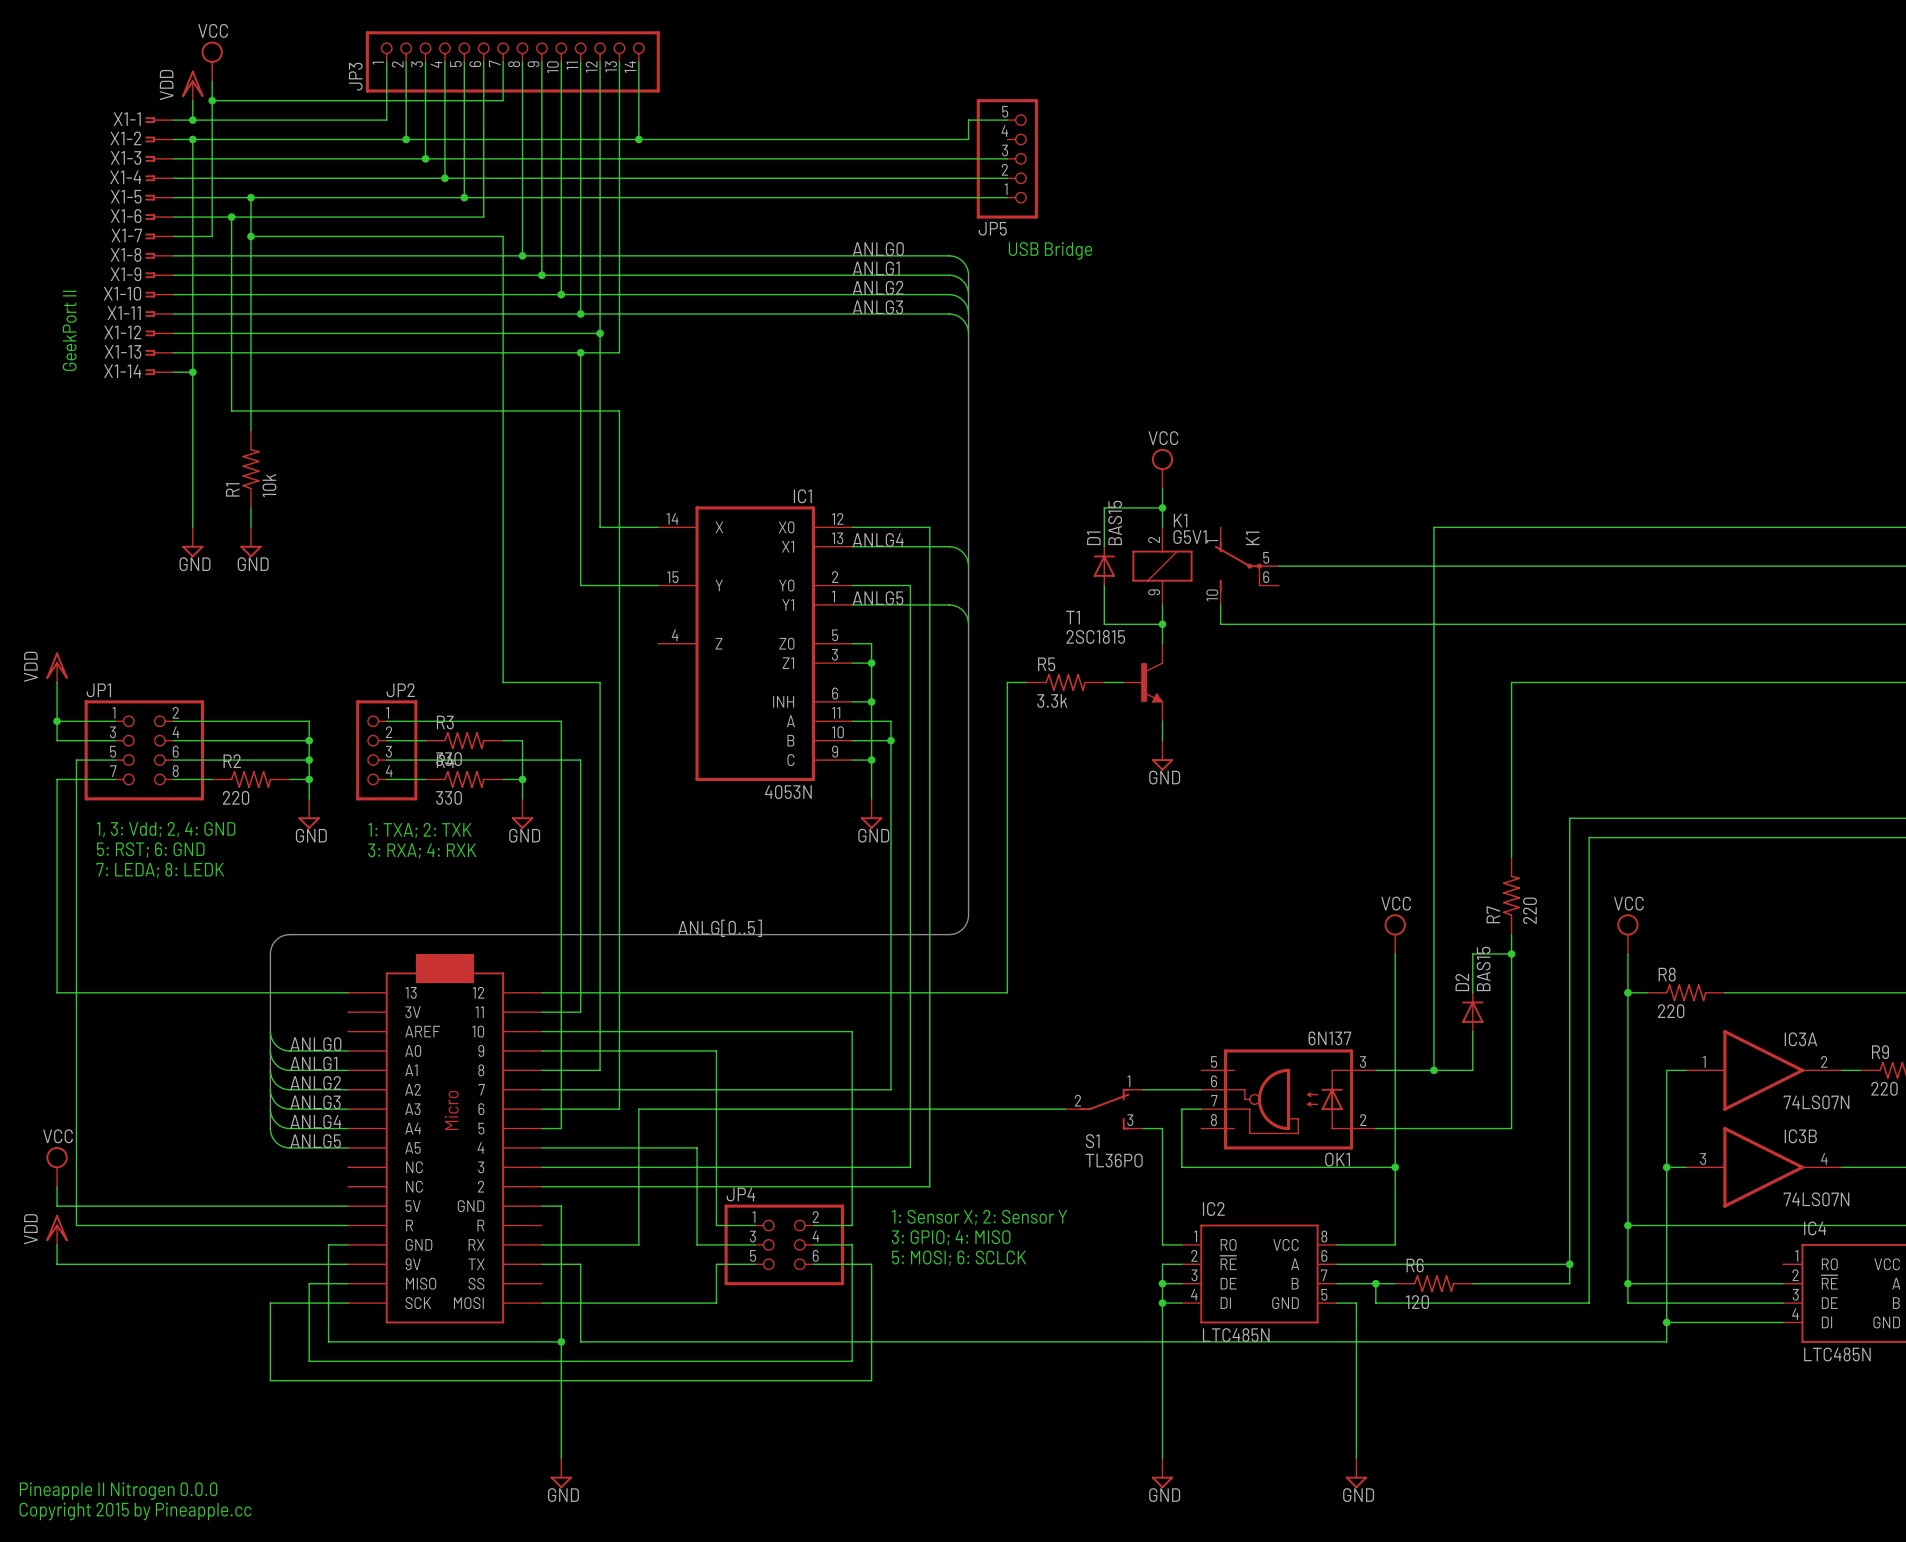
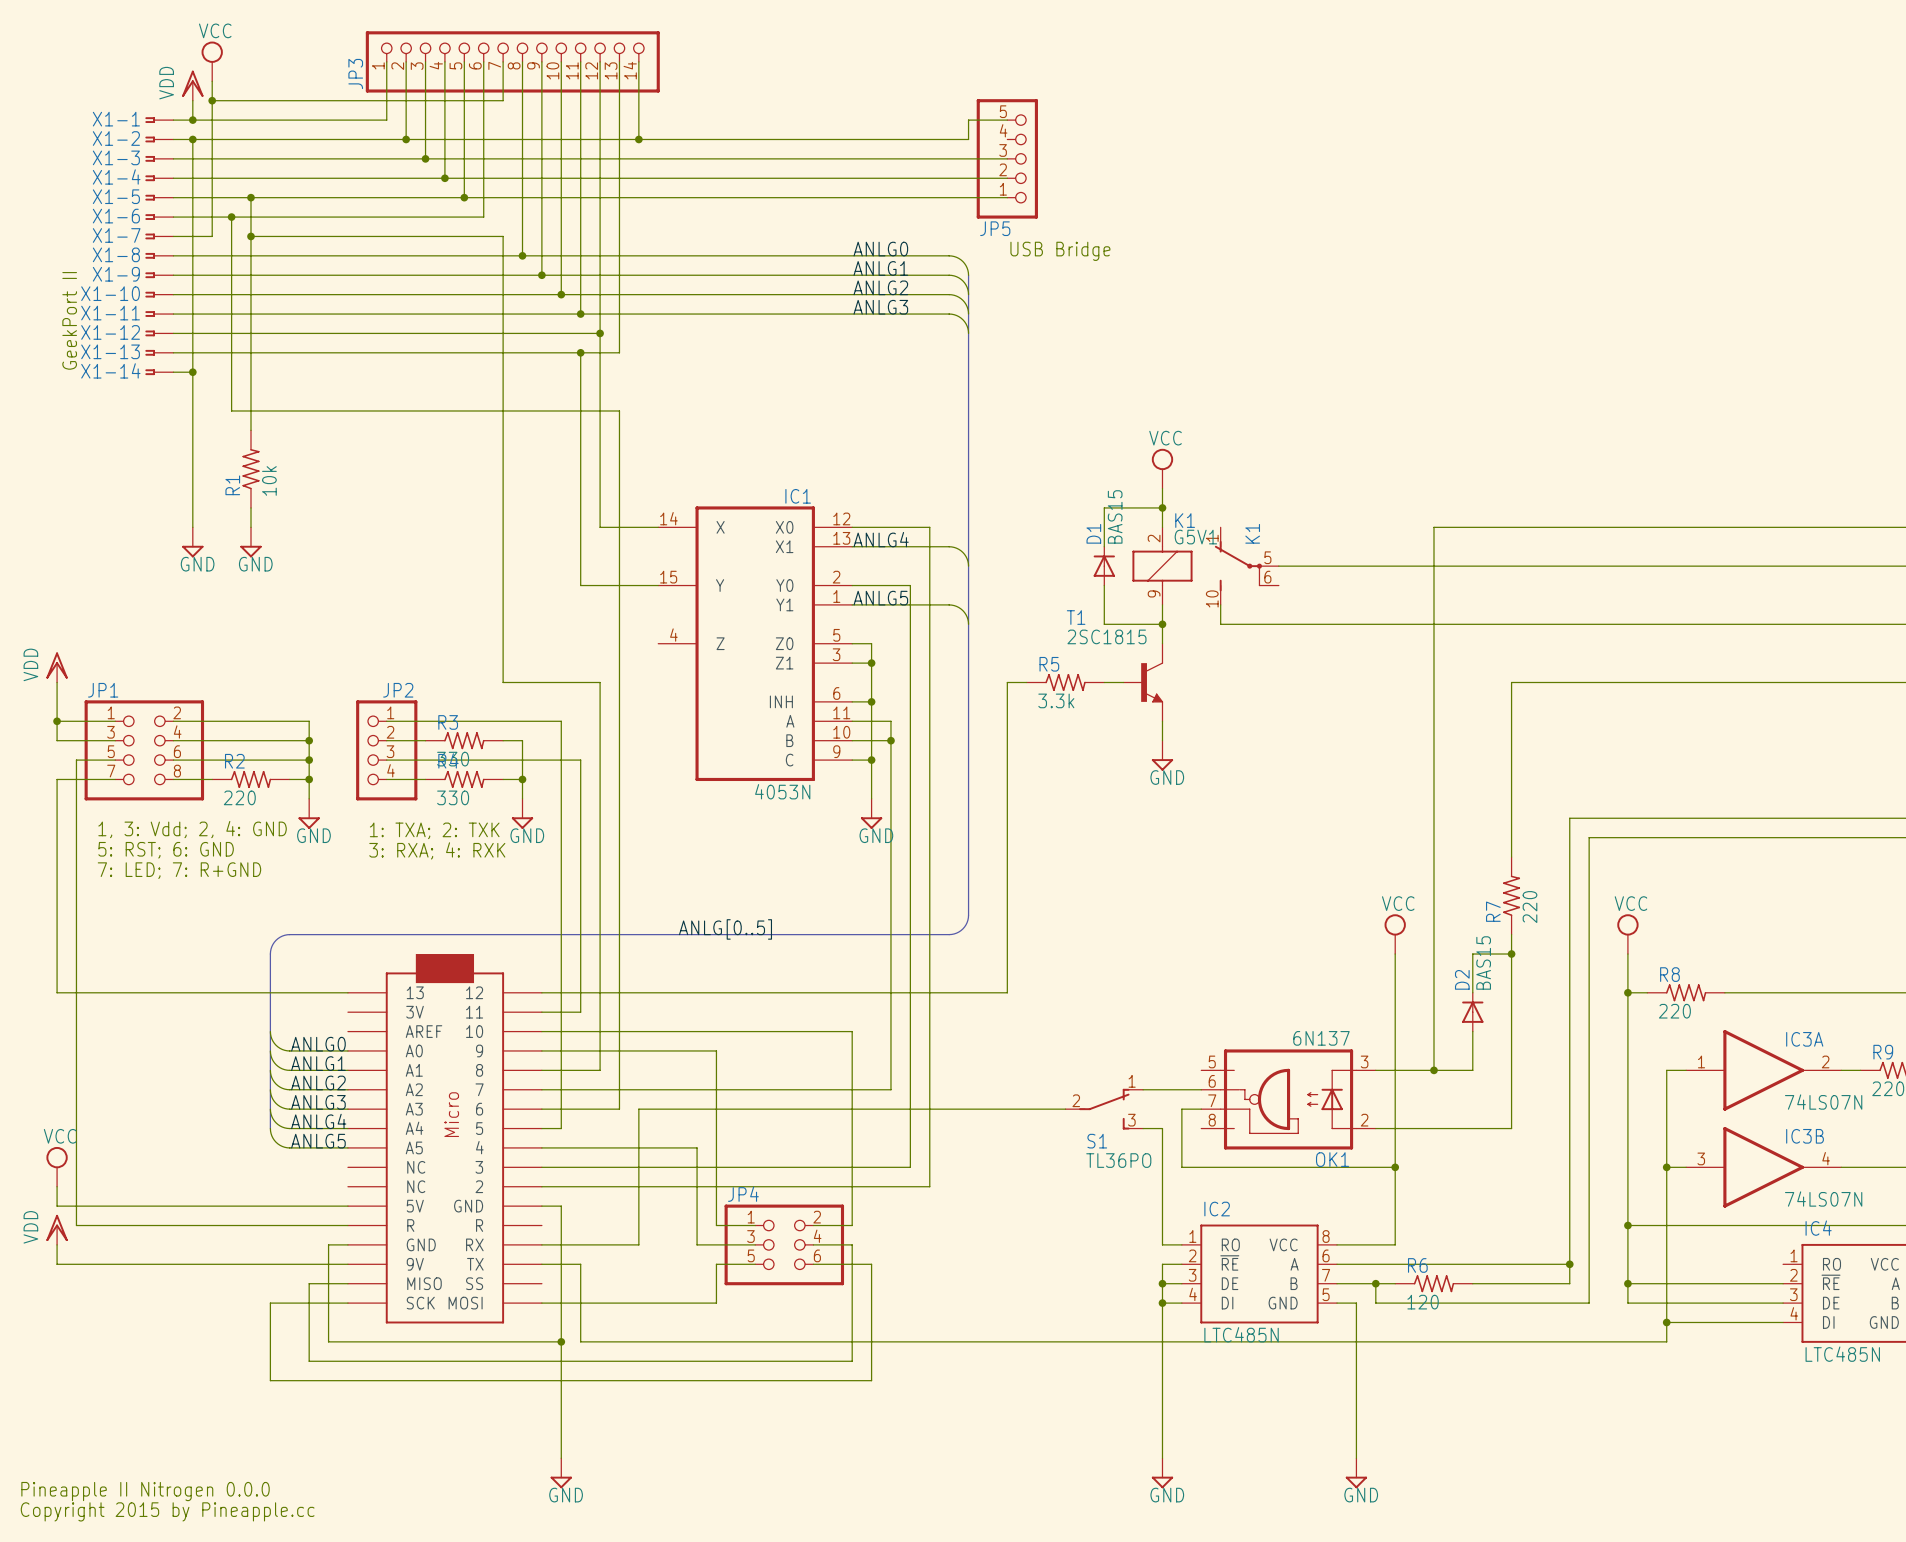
text: 7: LEDA; 8: LEDK (160, 870) -> 7: LED; 7: R+GND (179, 870)
text: 1: Sensor X; 2: Sensor Y (979, 1217) -> none
text: 3: GPIO; 4: MISO (951, 1237) -> none
text: 5: MOSI; 6: SCLCK (959, 1258) -> none

